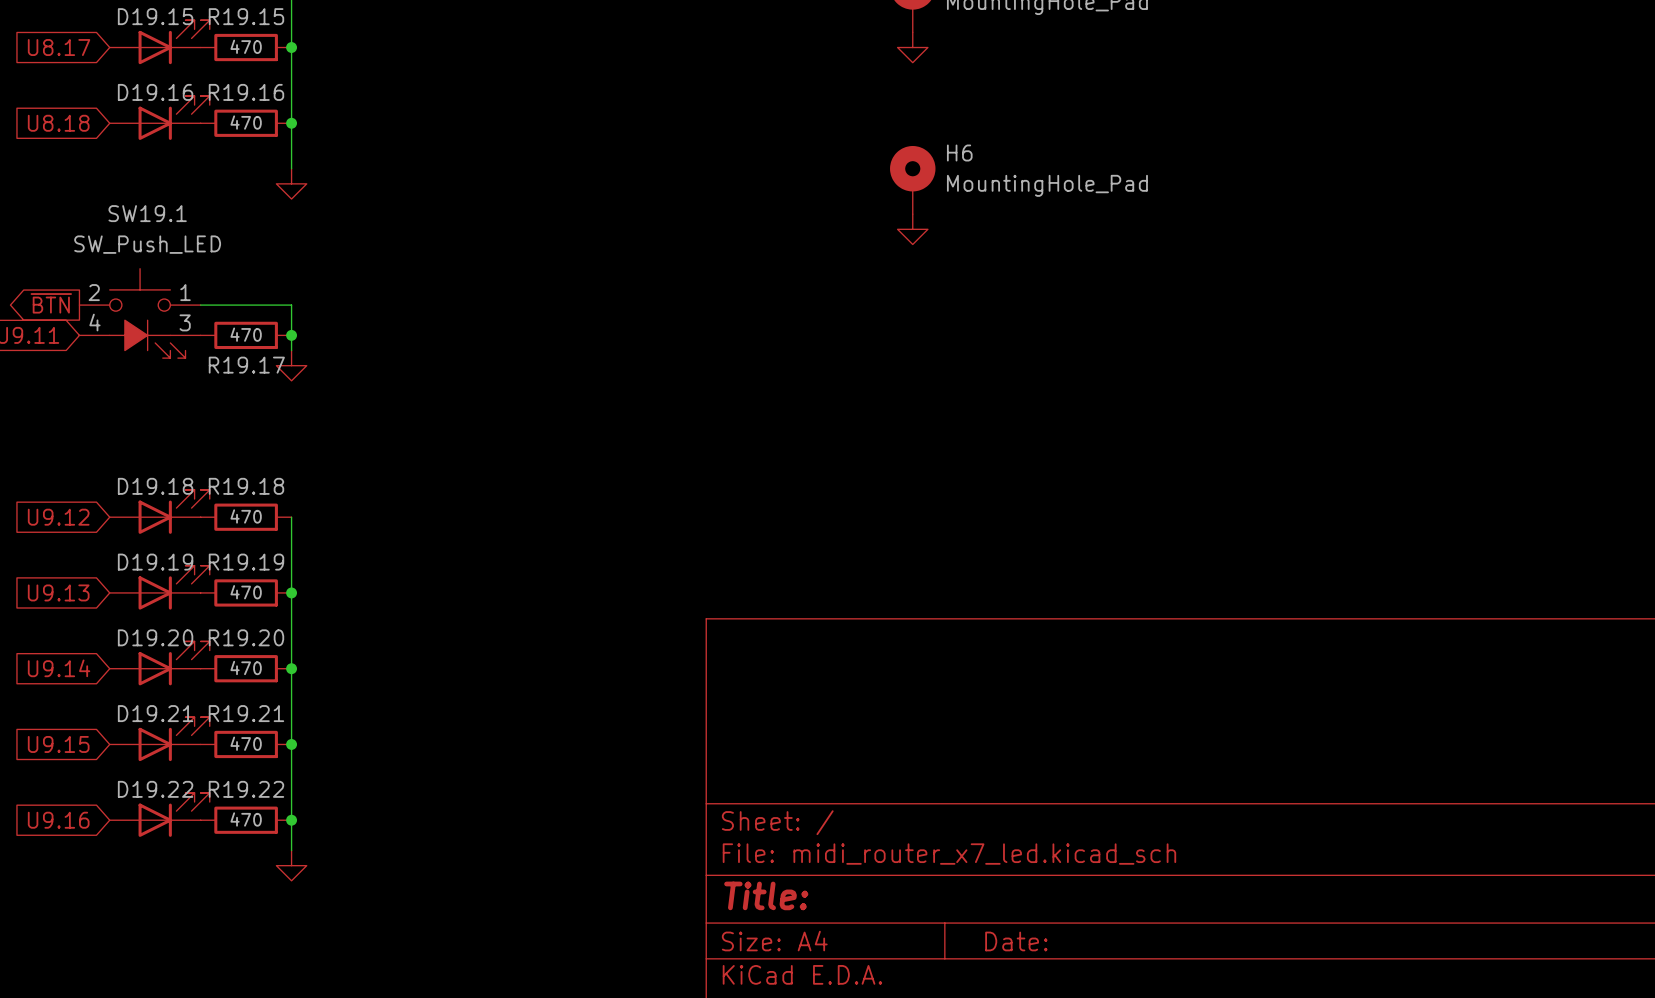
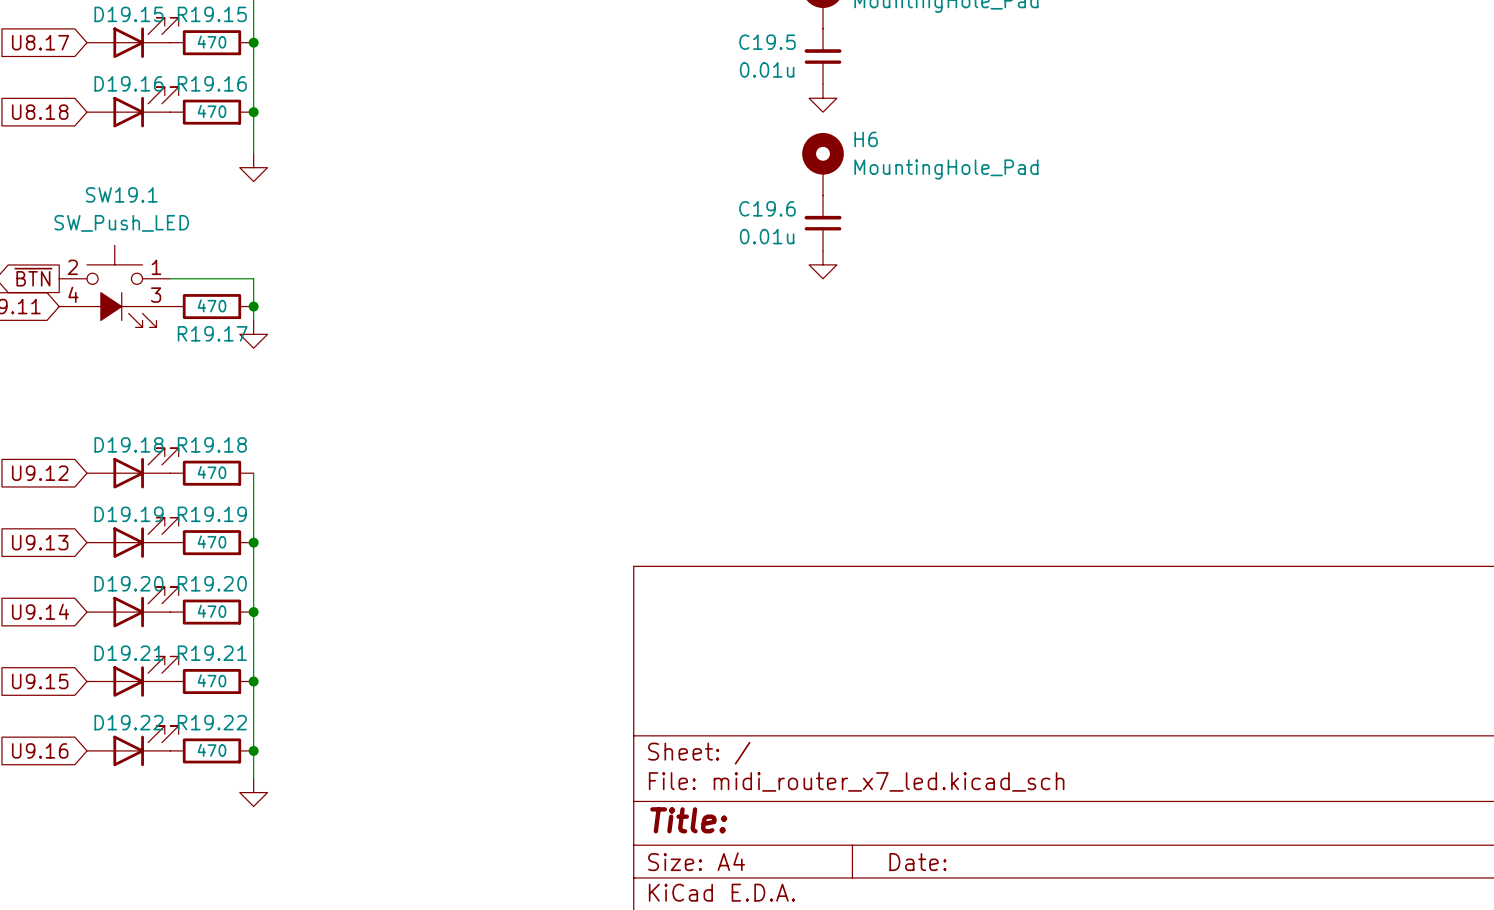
power symbol: (912, 47) -> none
C19.5: none -> 0.01u (823, 56)
power symbol: none -> (823, 98)
power symbol: (912, 229) -> none
C19.6: none -> 0.01u (823, 223)
power symbol: none -> (823, 264)

